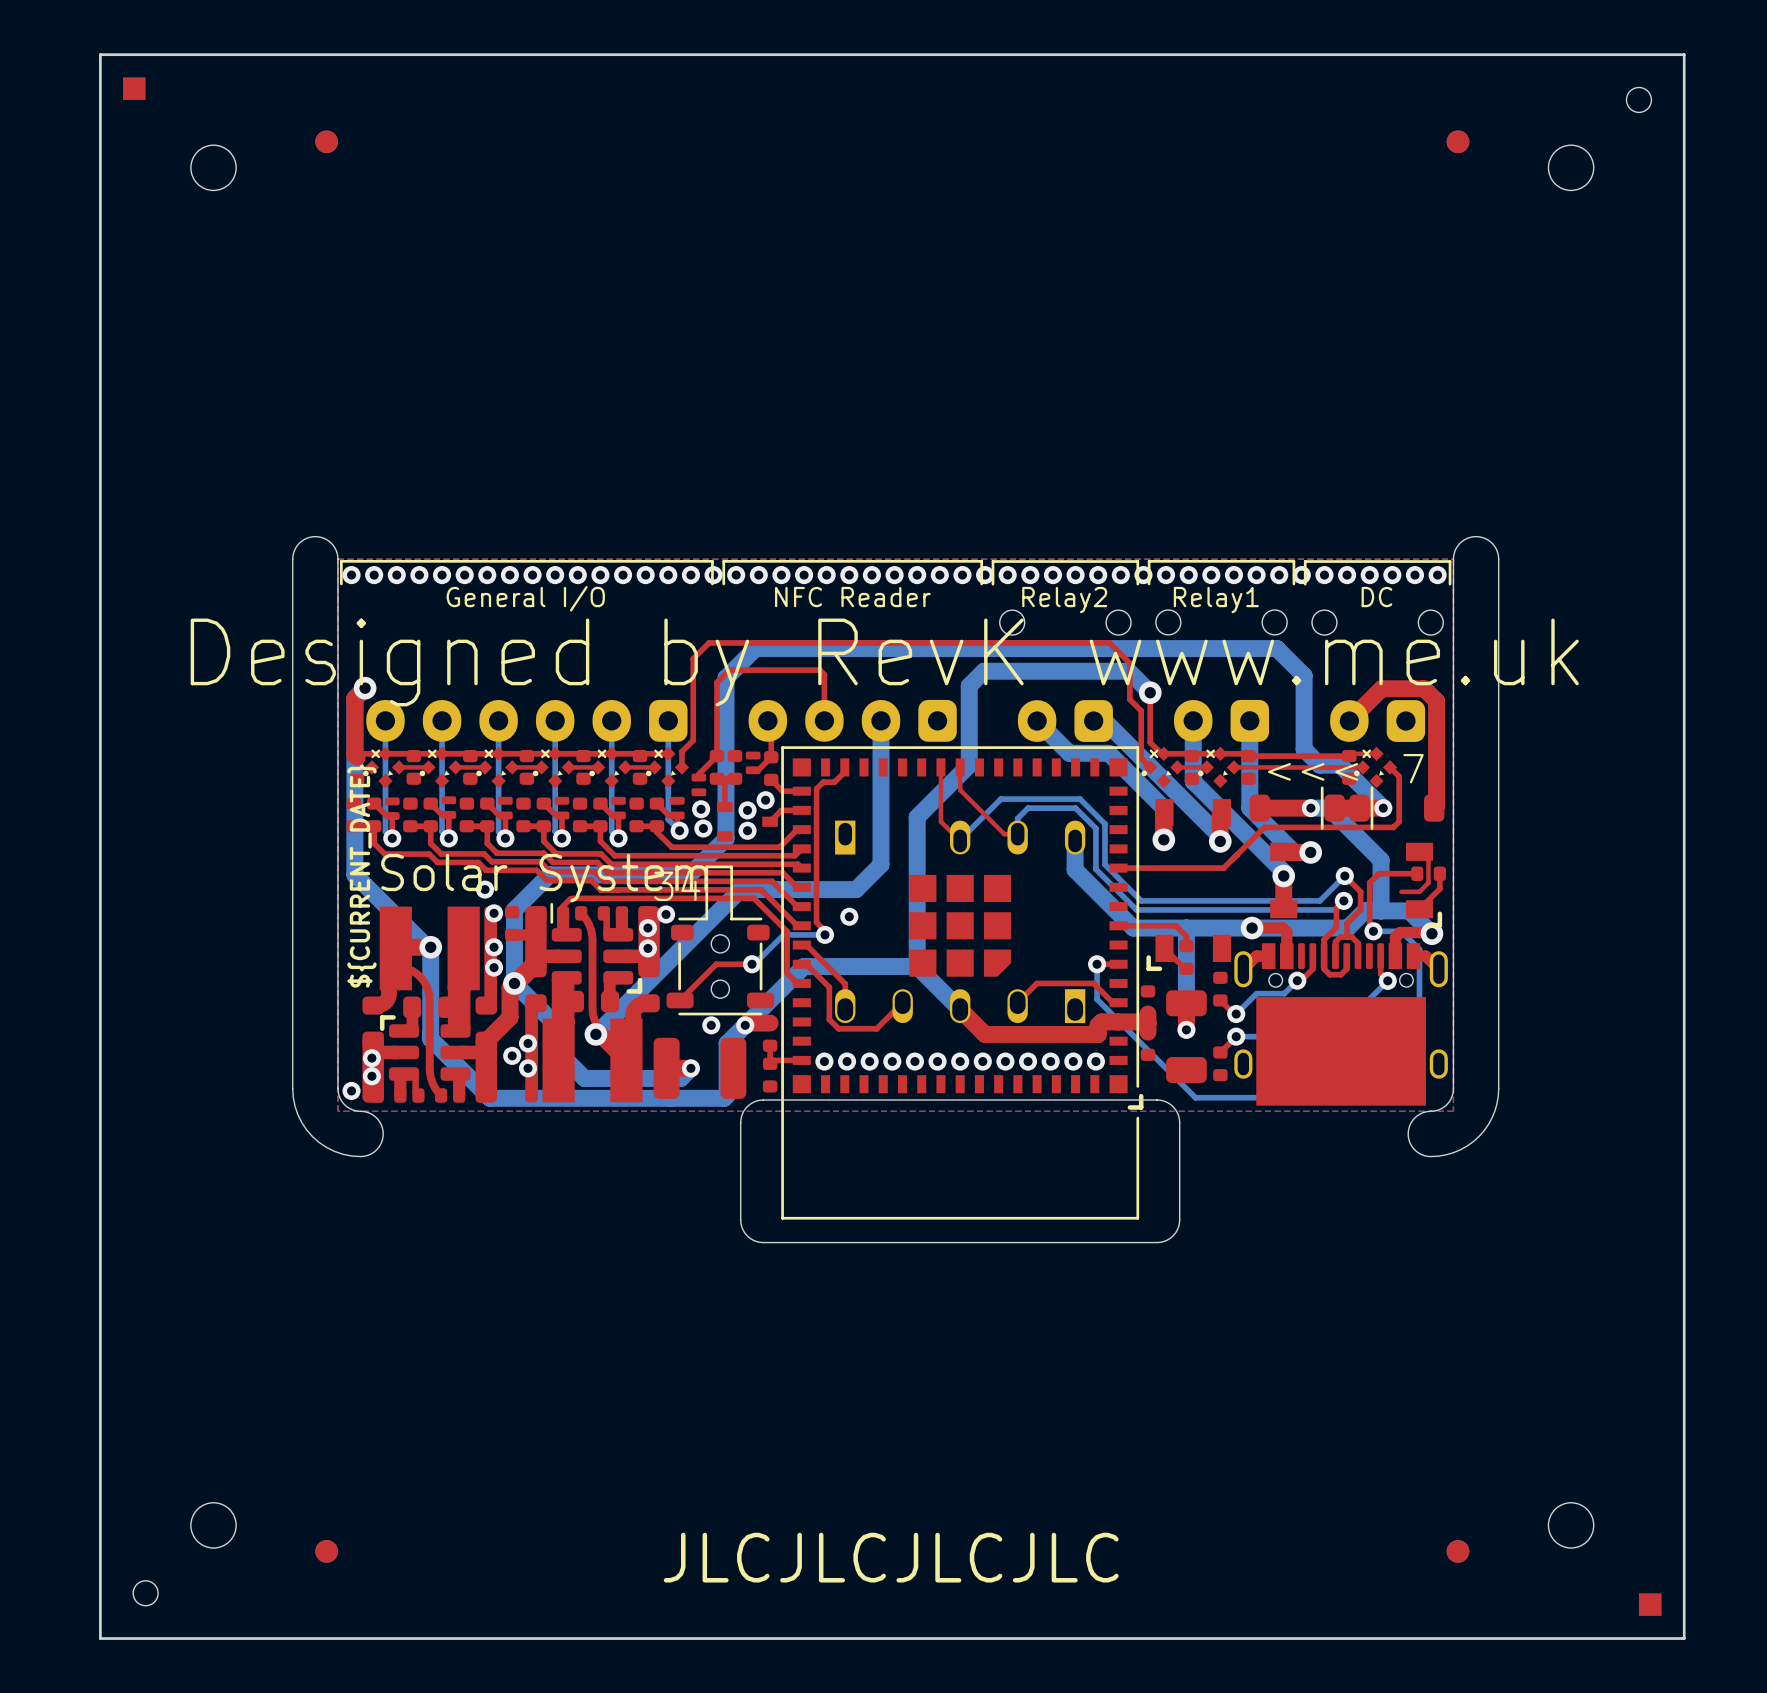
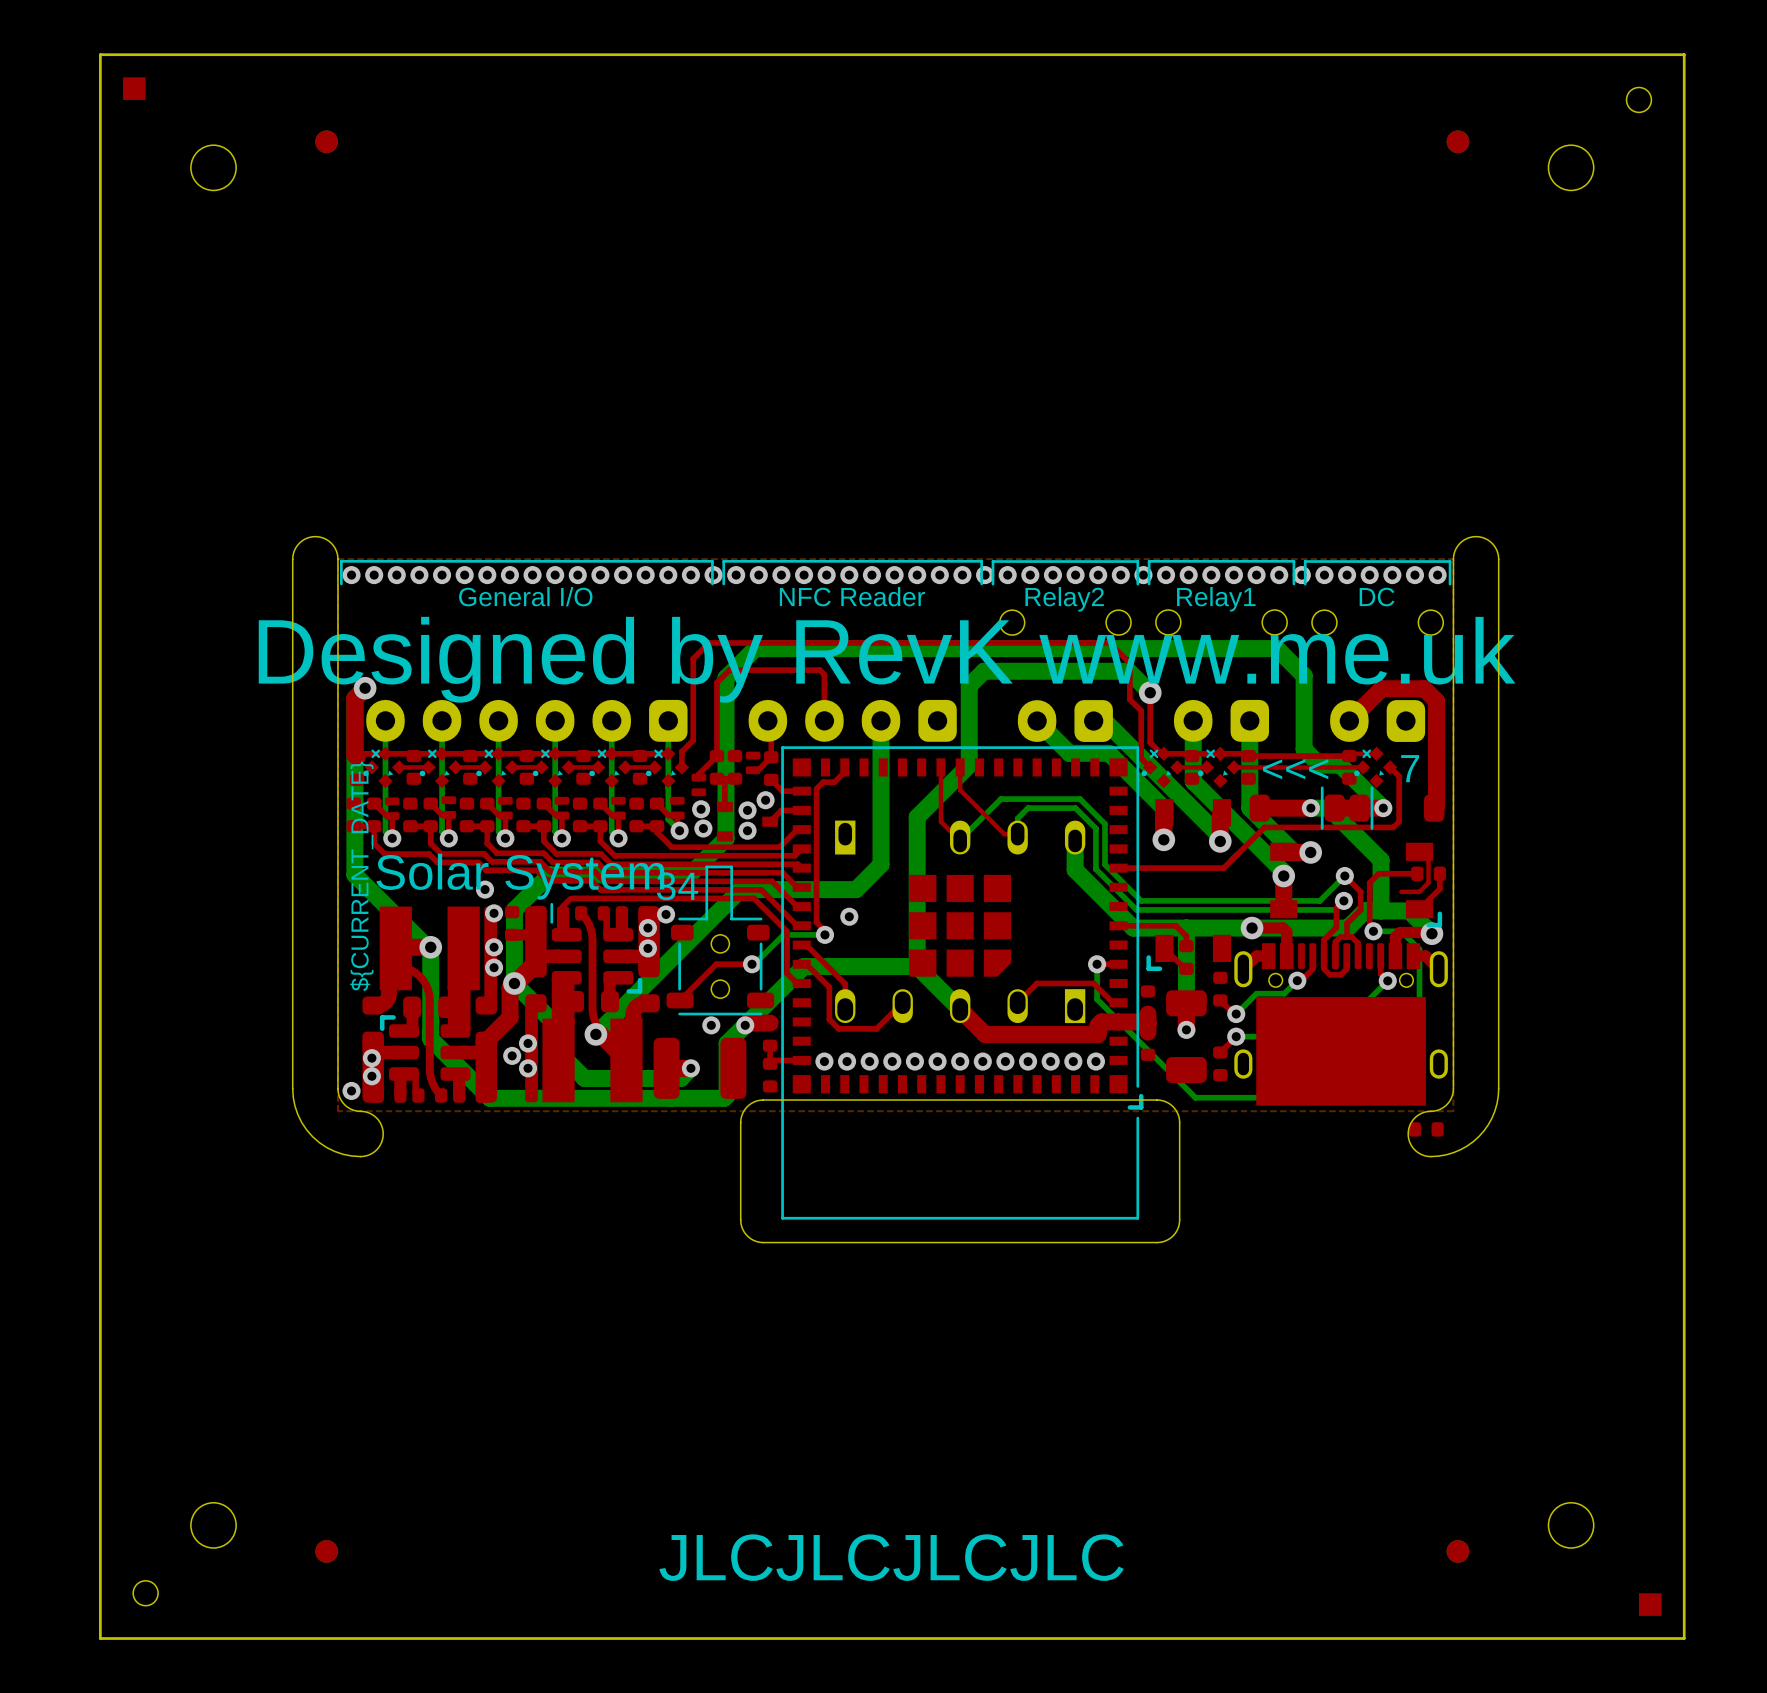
part: none -> (1426, 1129)

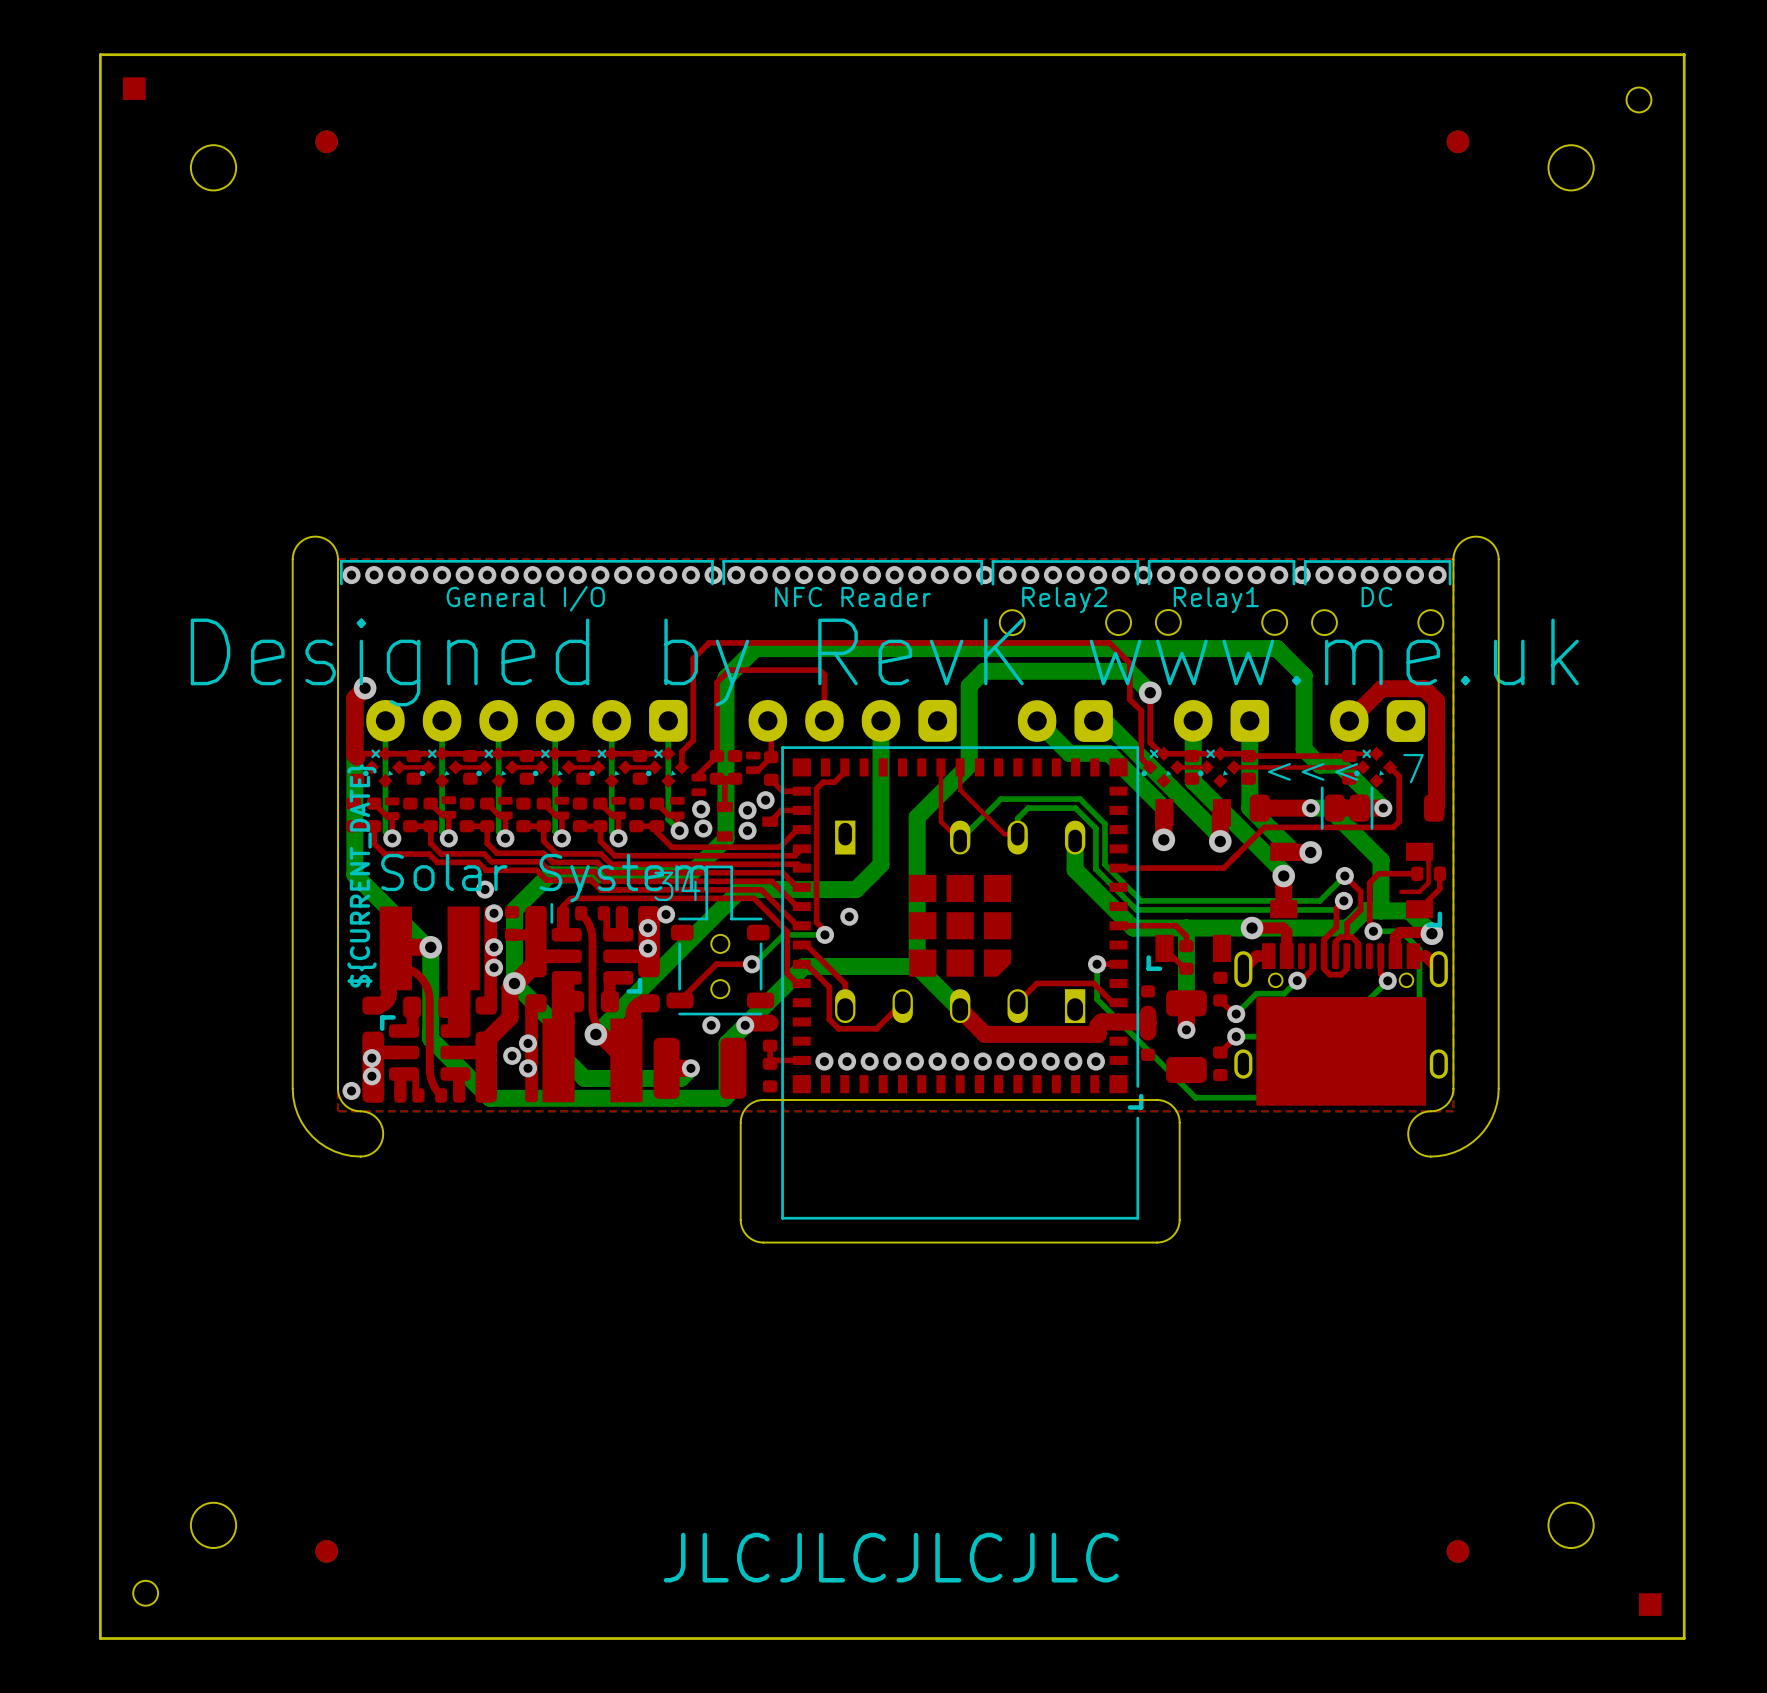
part: (1426, 1129) -> none

